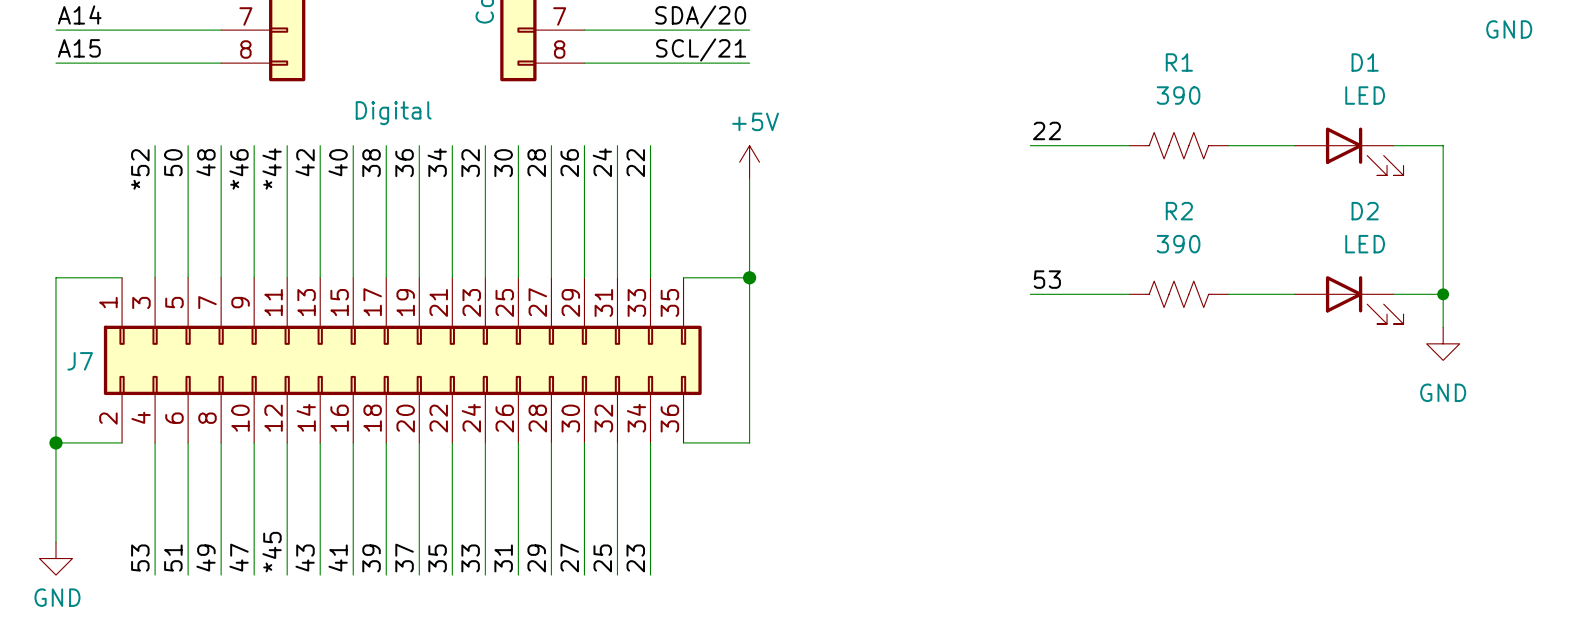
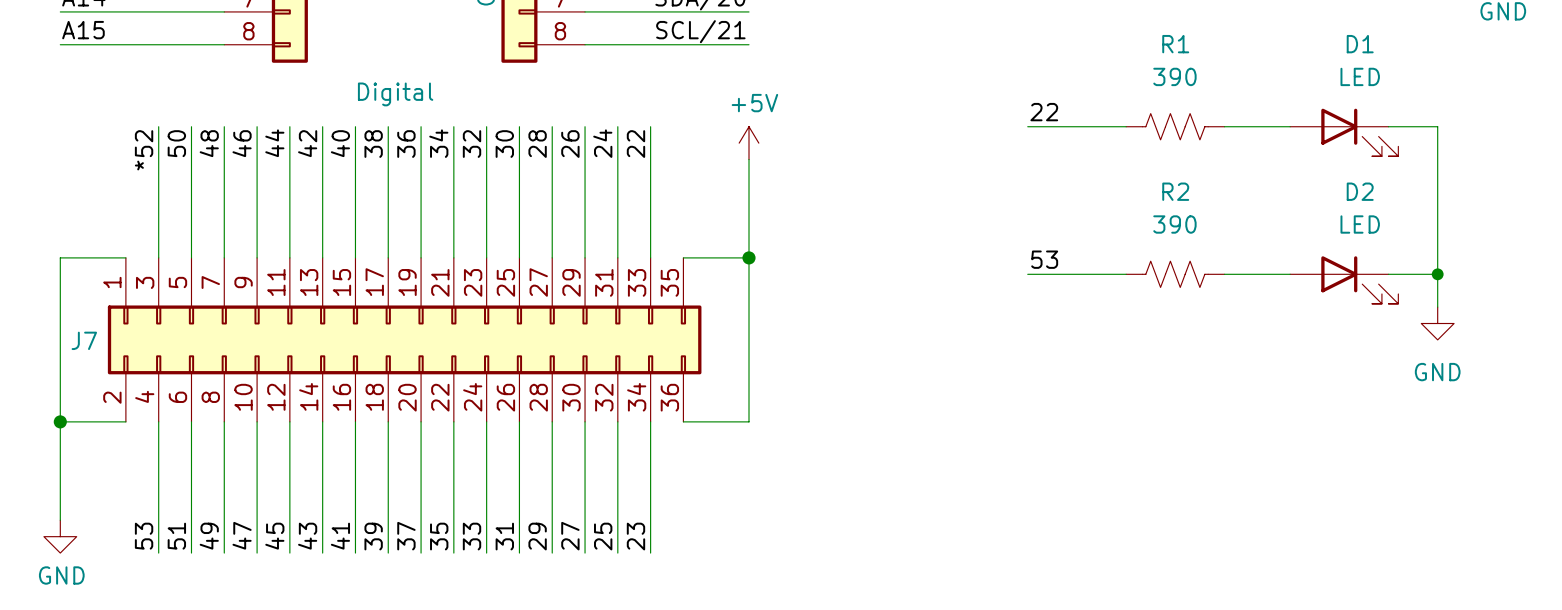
label: *46 (239, 169) -> 46 (242, 143)
label: *44 (272, 169) -> 44 (274, 143)
label: *45 (272, 552) -> 45 (274, 536)

